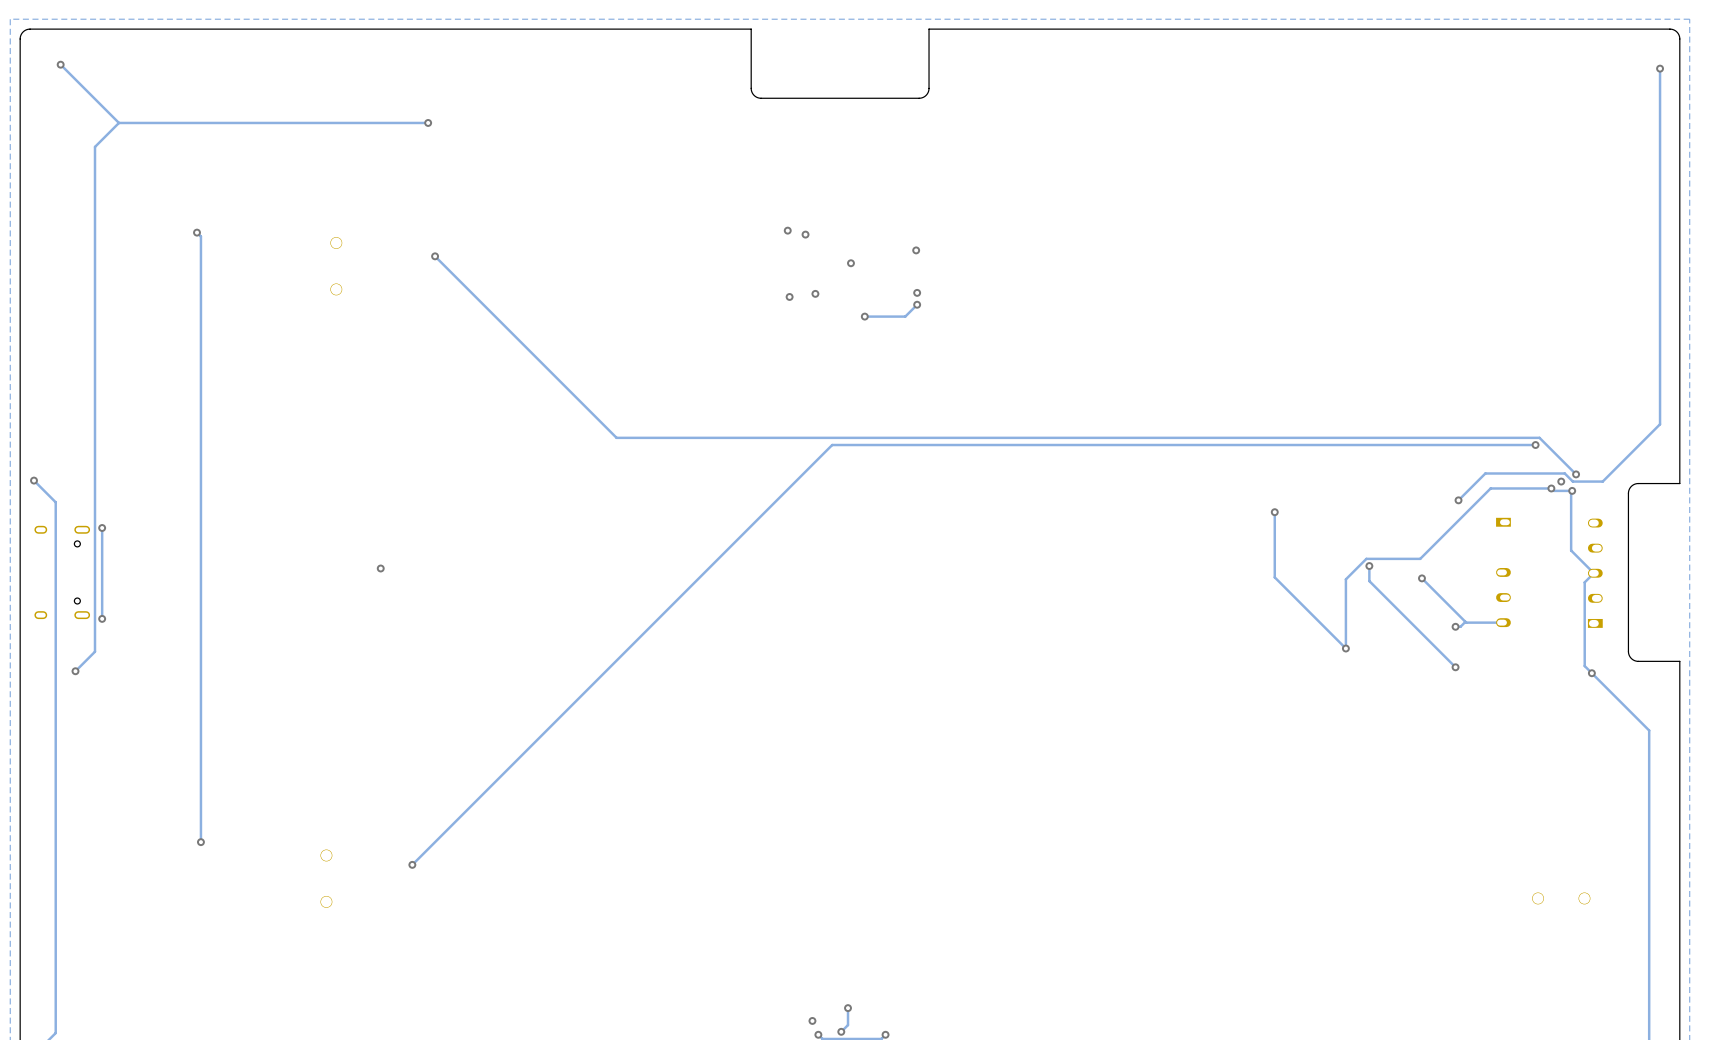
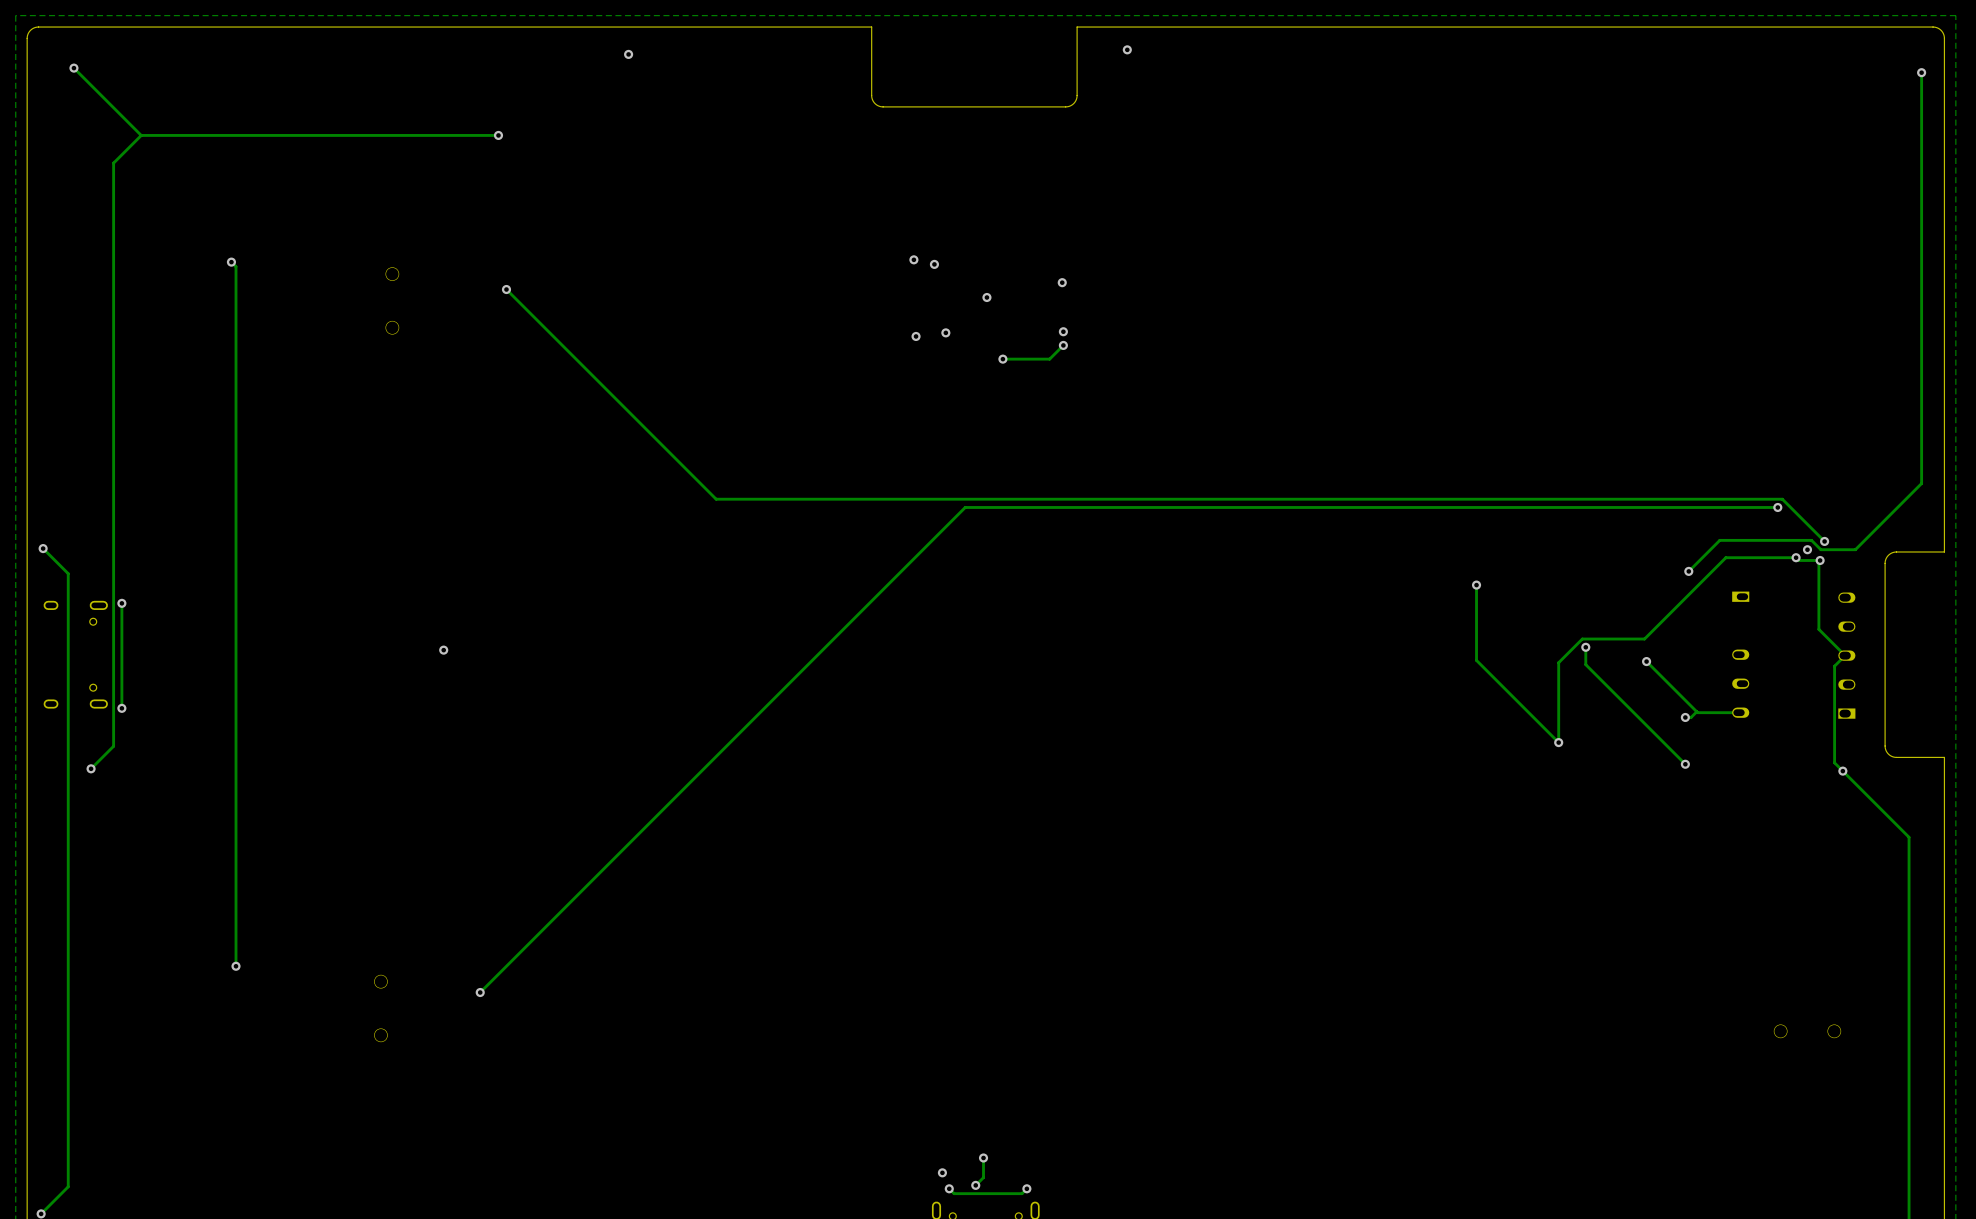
via: none -> (1127, 49)
via: none -> (628, 54)

